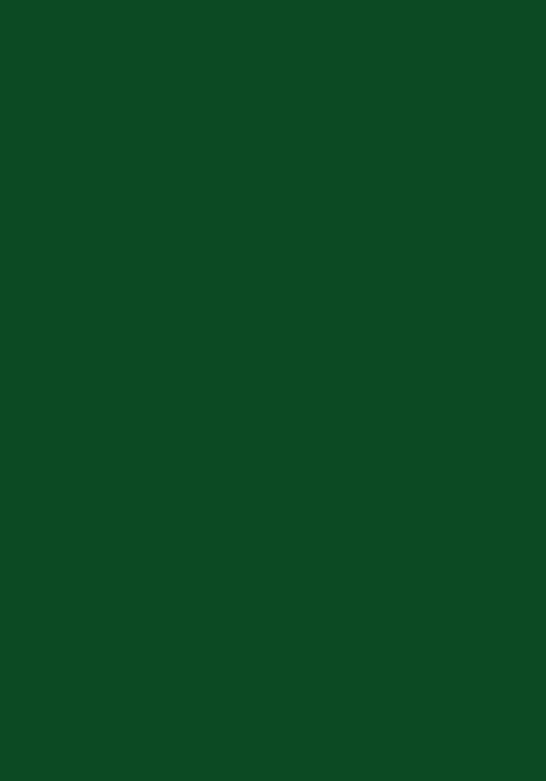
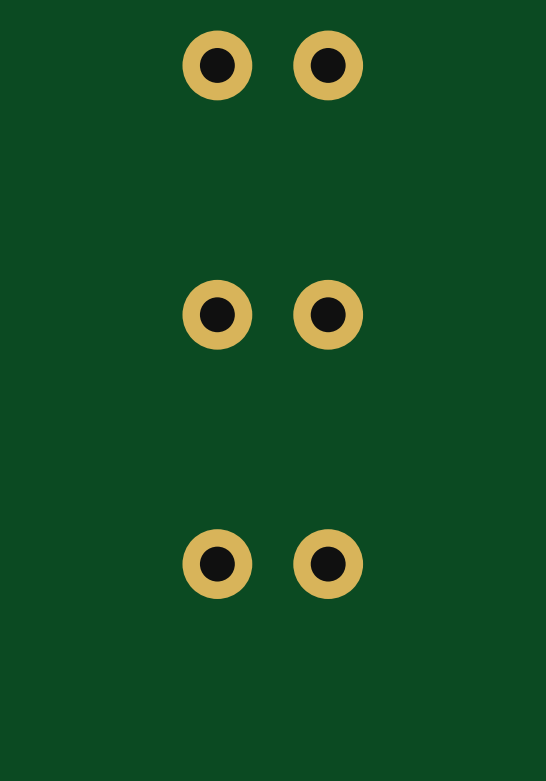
part: none -> (272, 65)
part: none -> (272, 314)
part: none -> (272, 564)

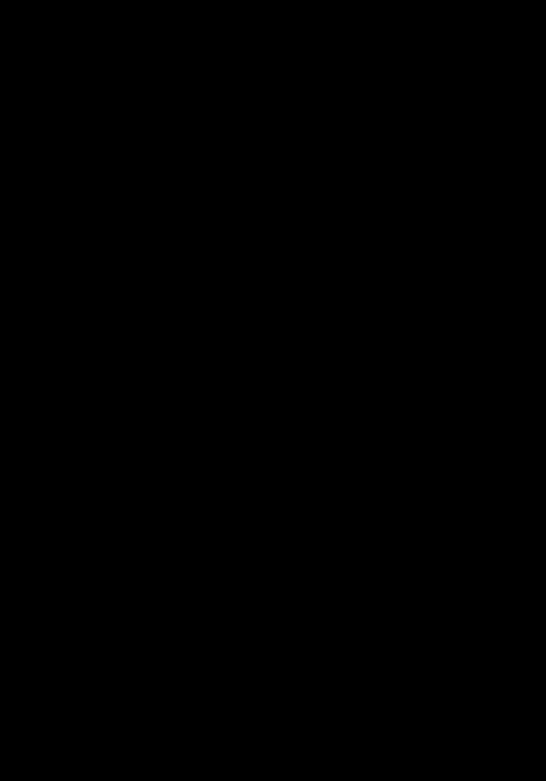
part: (272, 65) -> none
part: (272, 314) -> none
part: (272, 564) -> none

